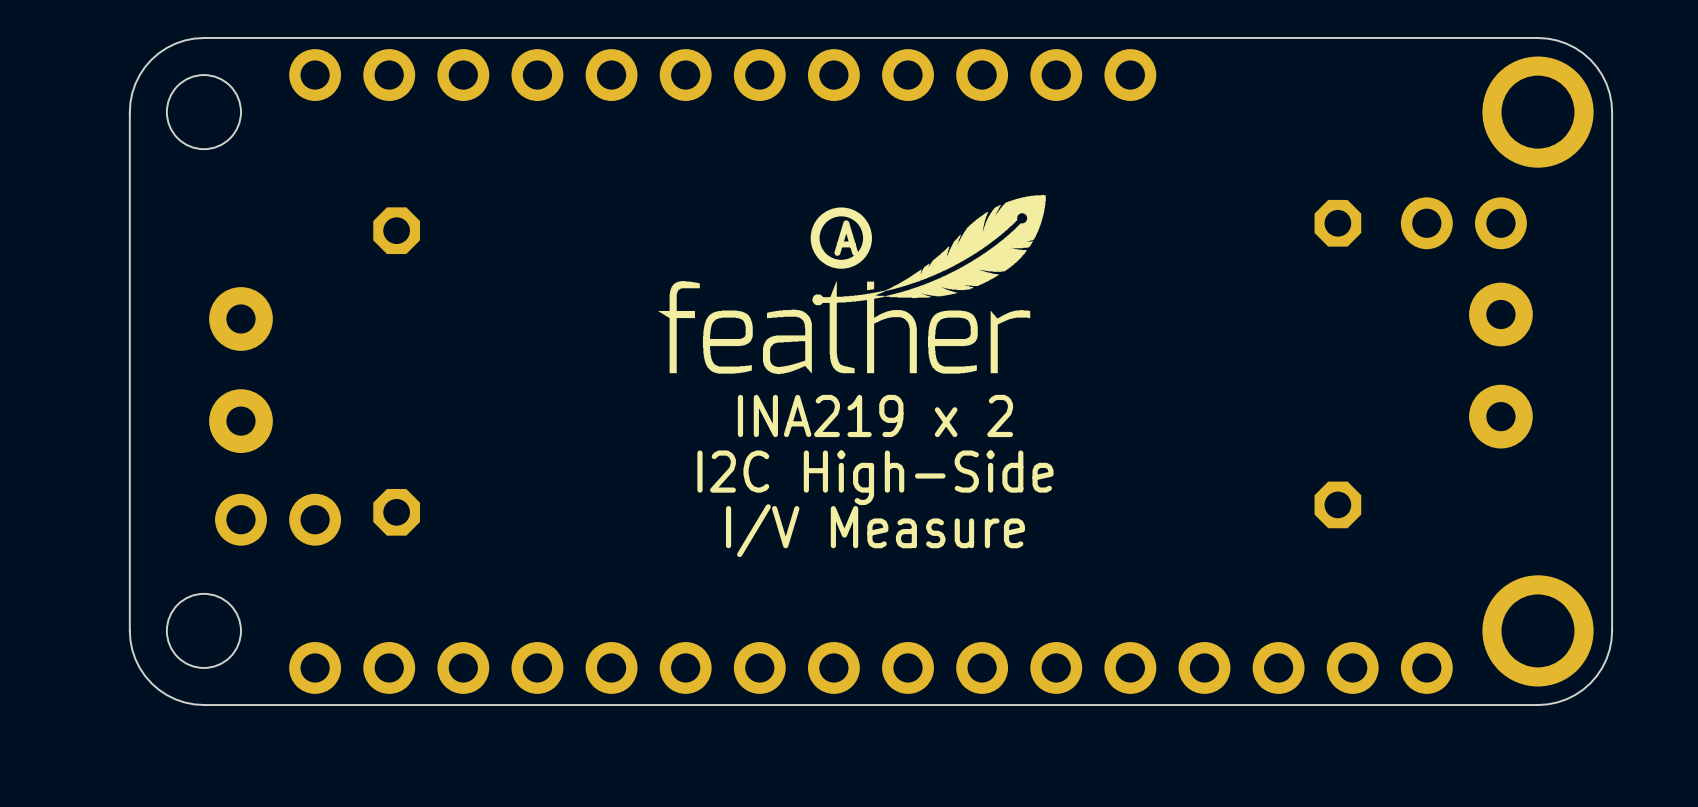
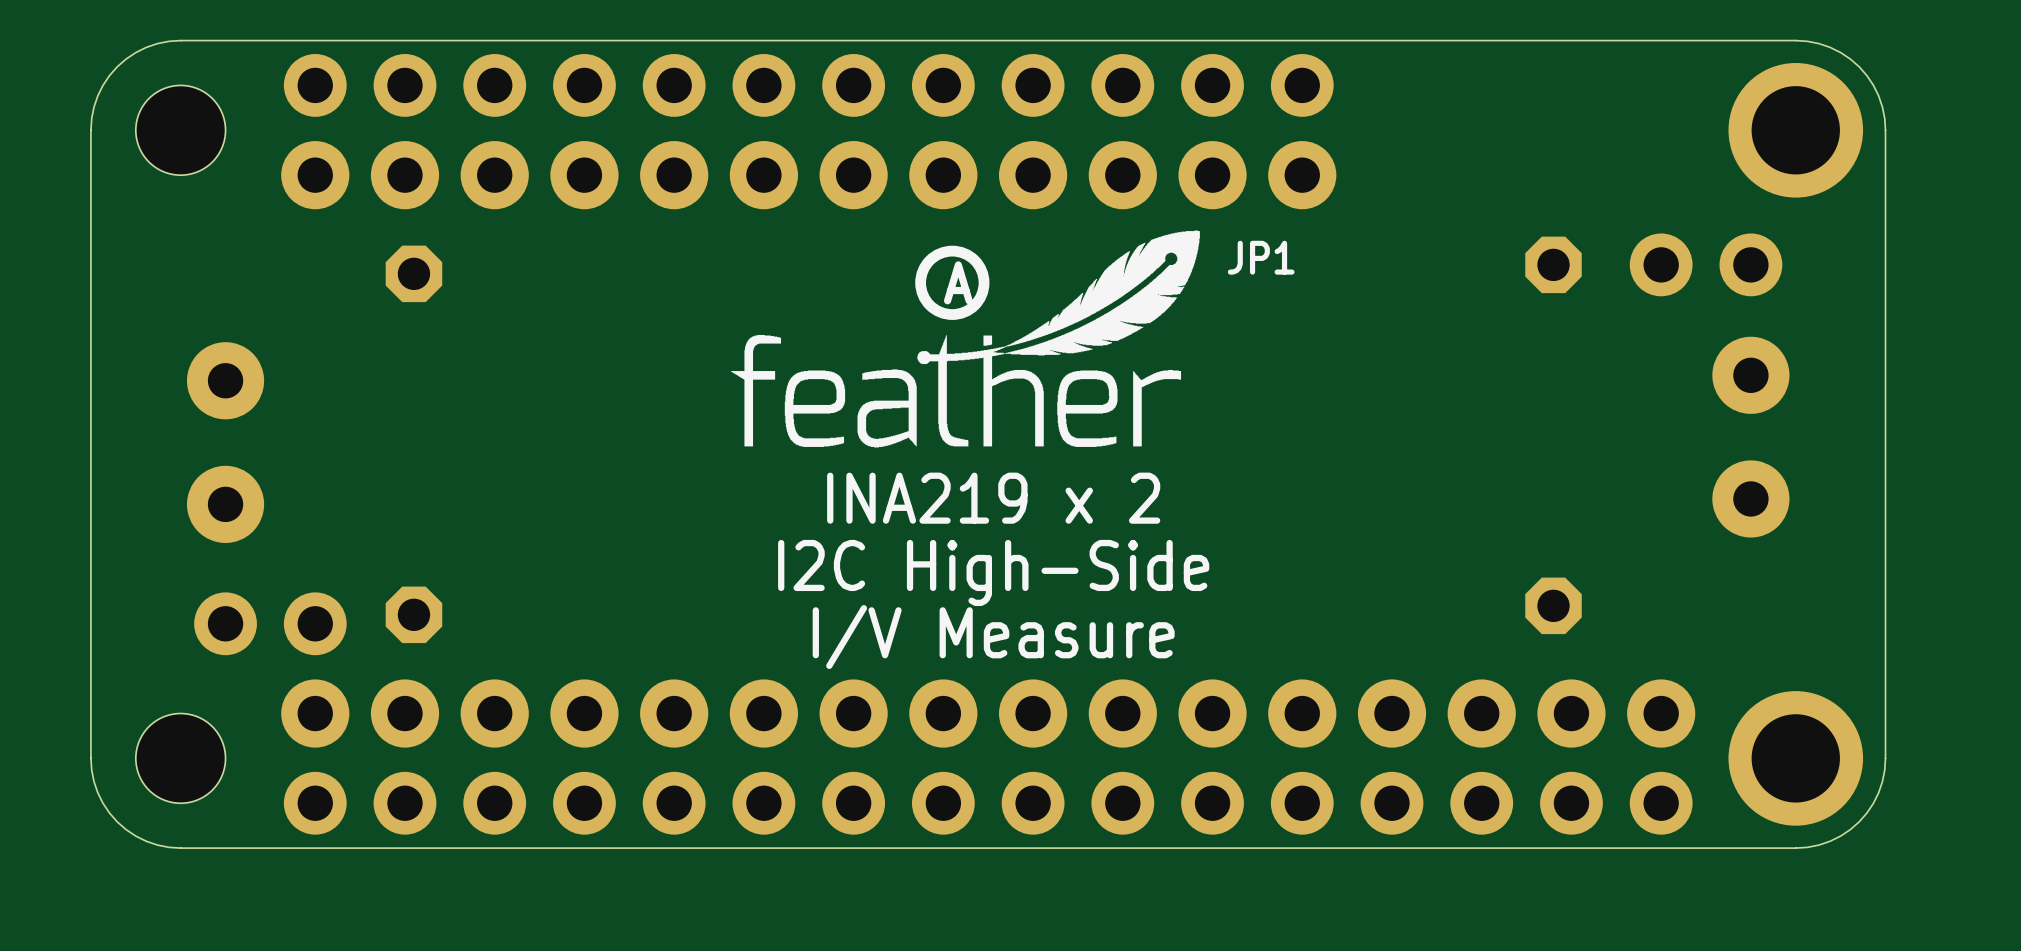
JP1: none -> (808, 175)
part: none -> (988, 713)

